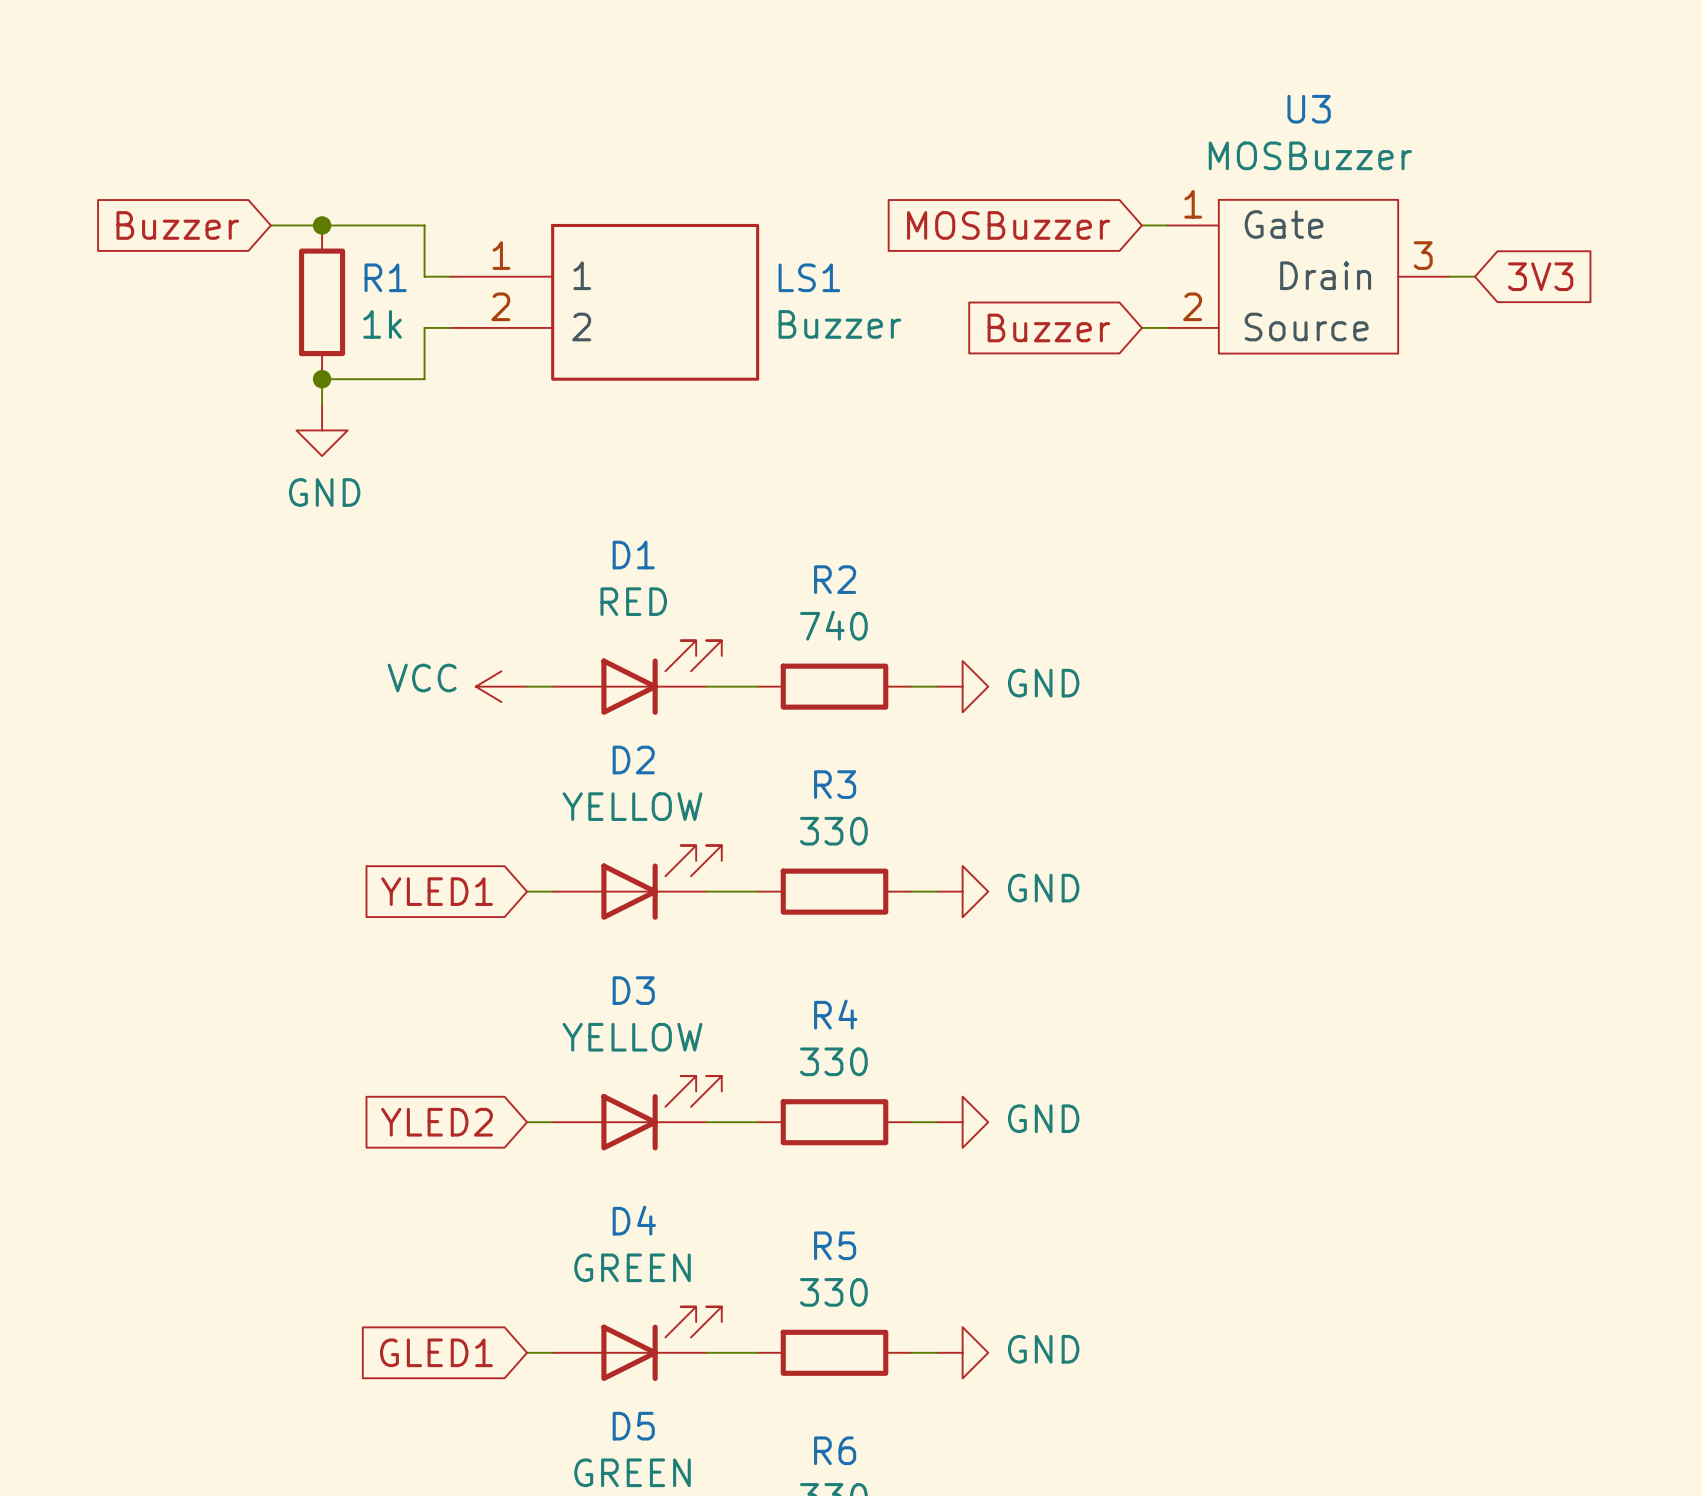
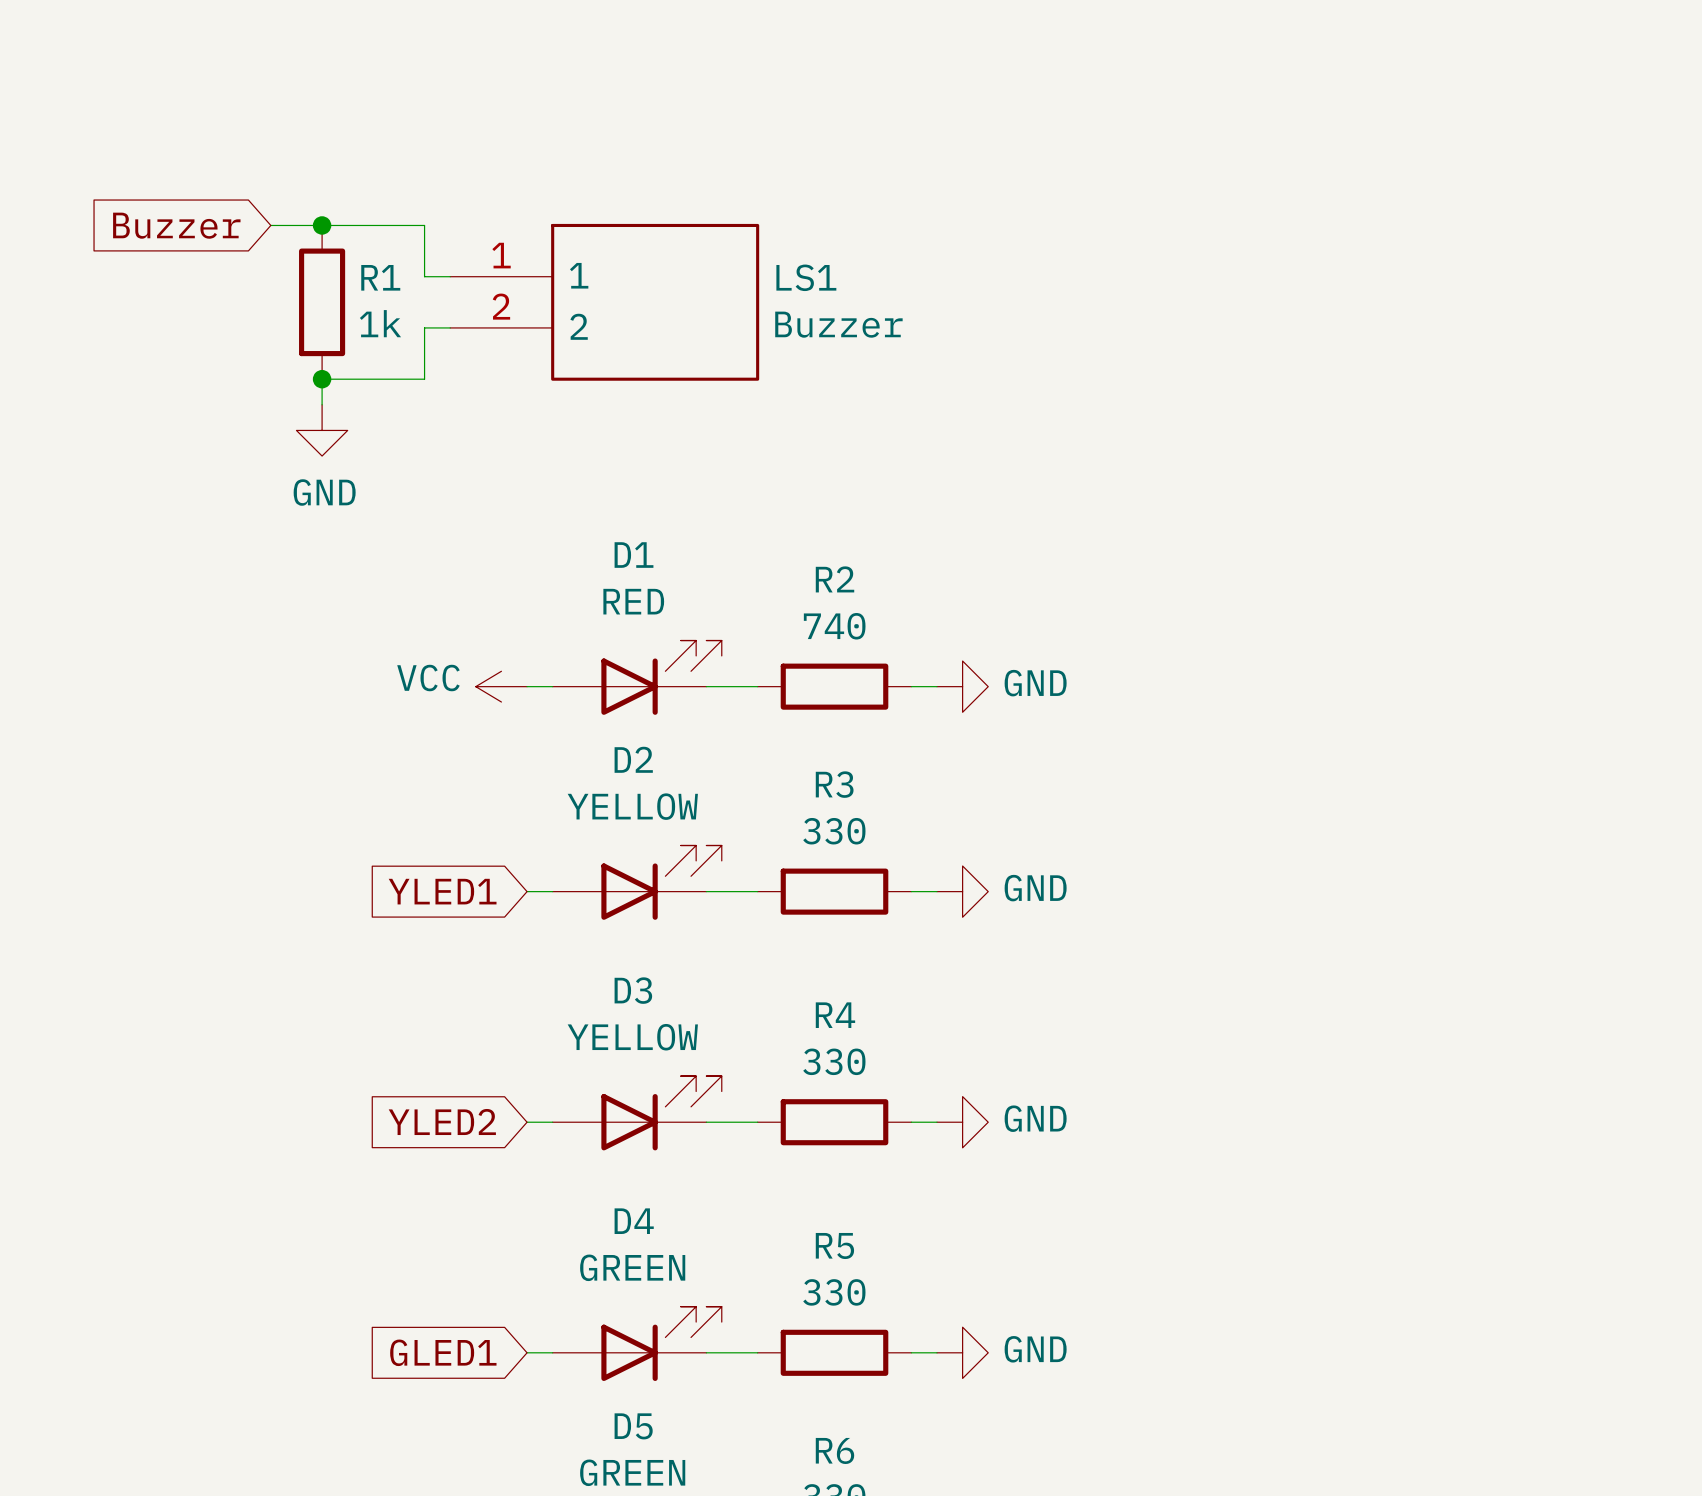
global label: MOSBuzzer (1008, 225) -> none
wire: (1141, 225) (1167, 225) -> none
U3: MOSBuzzer (1308, 276) -> none
wire: (1449, 276) (1475, 276) -> none
global label: 3V3 (1540, 276) -> none
global label: Buzzer (1048, 327) -> none
wire: (1141, 327) (1167, 327) -> none

